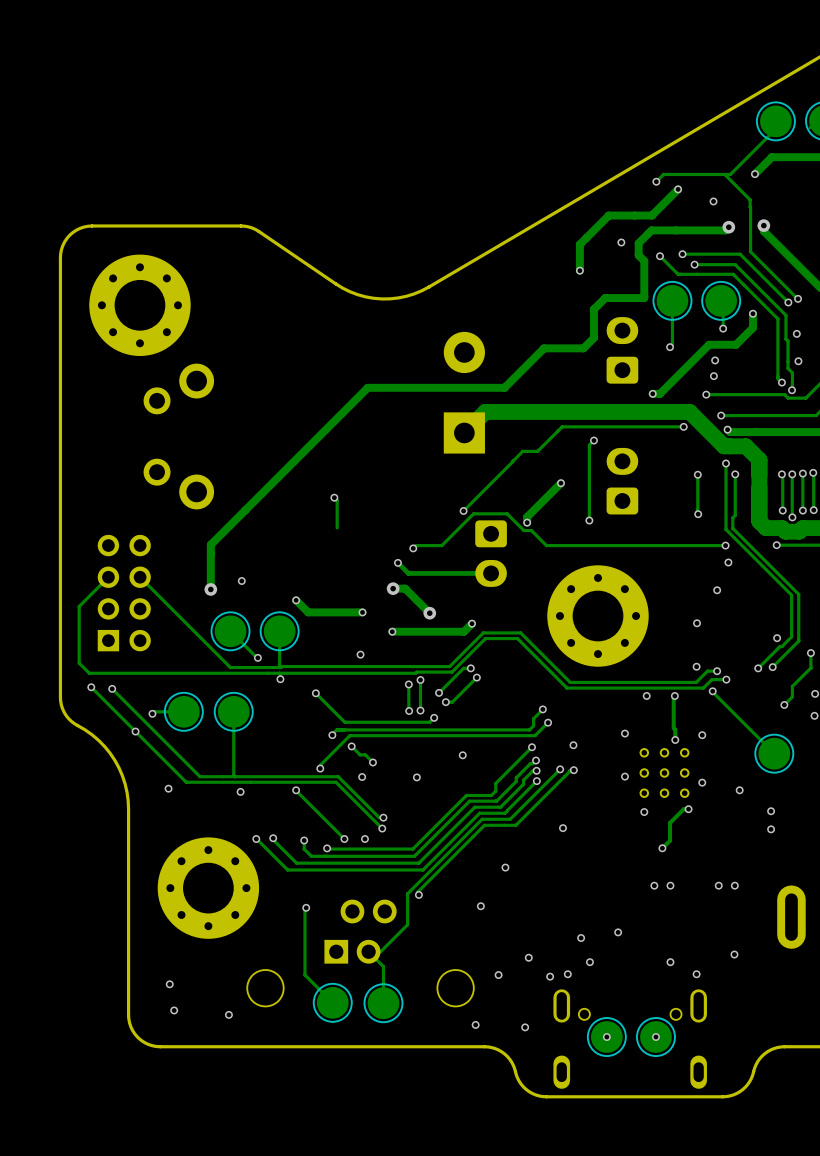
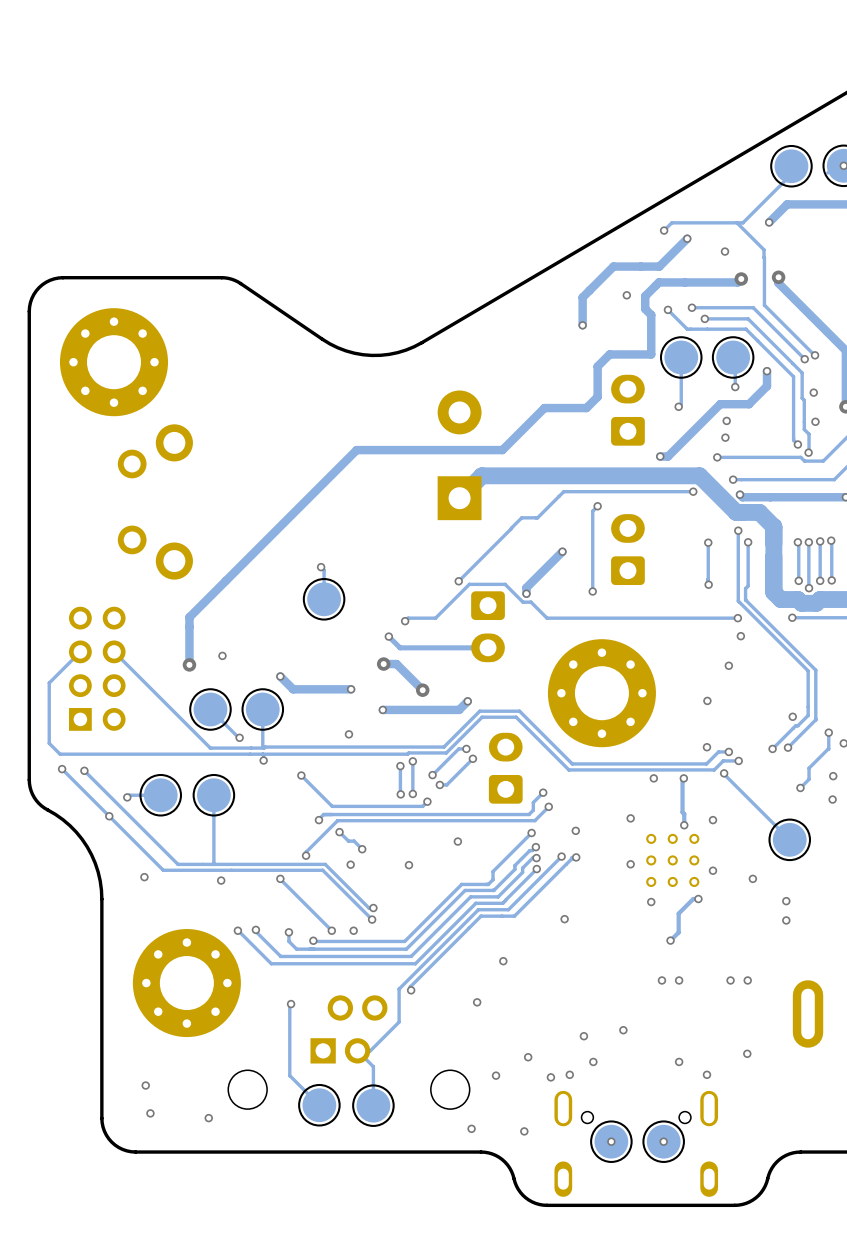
part: none -> (324, 599)
part: none -> (505, 768)

